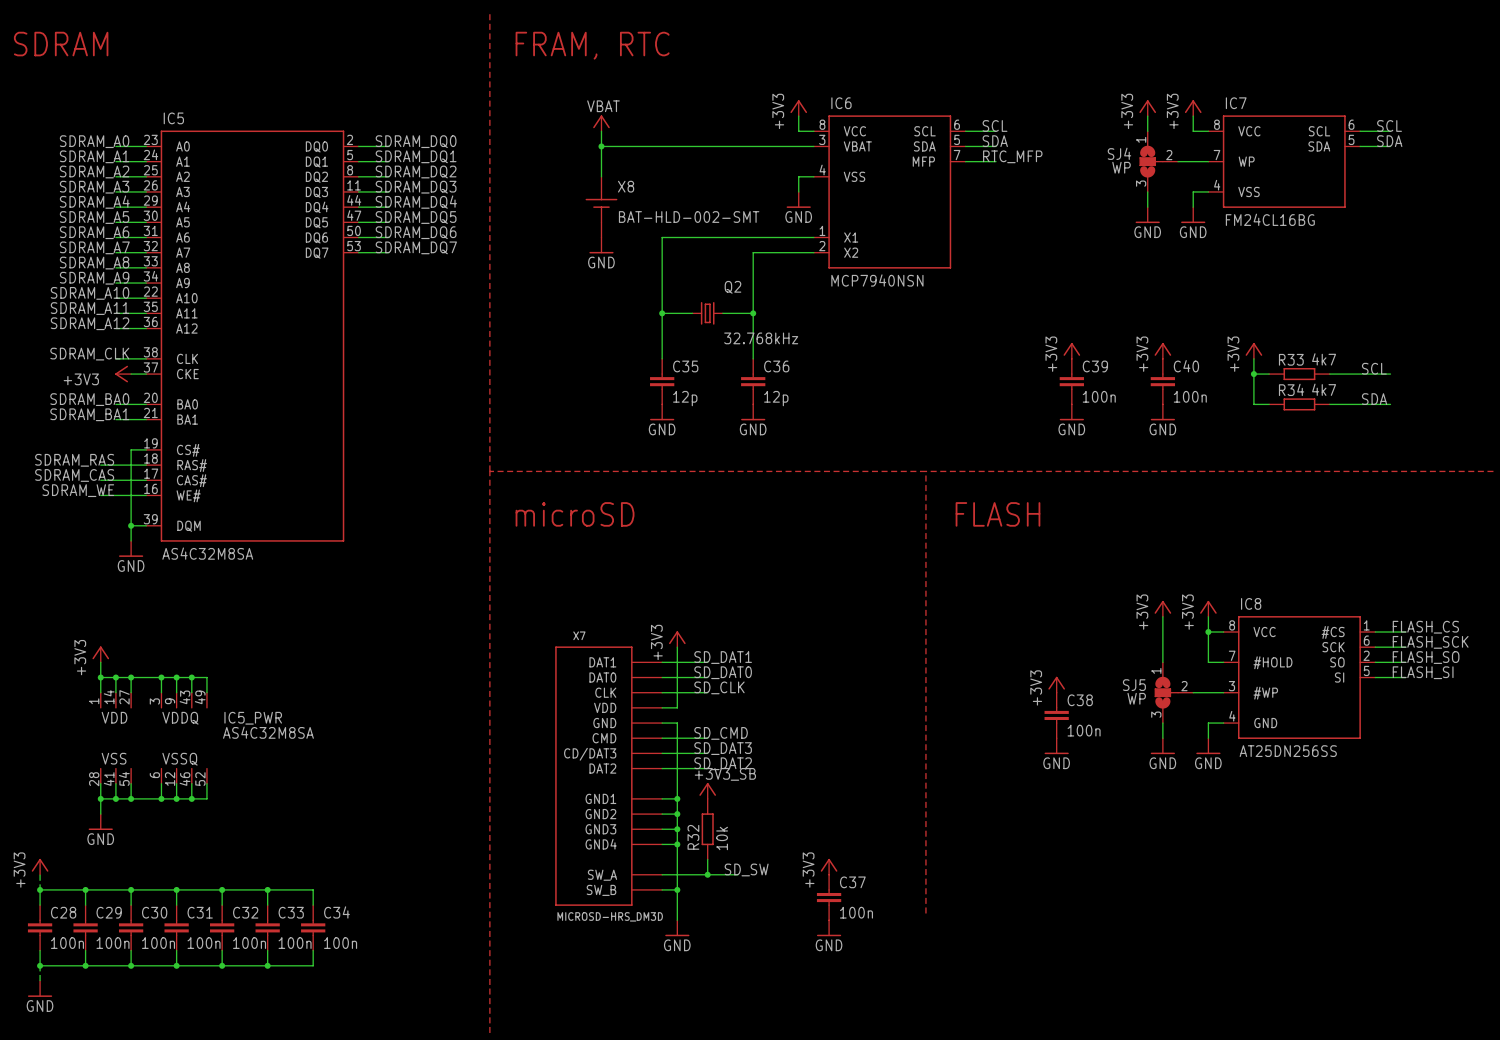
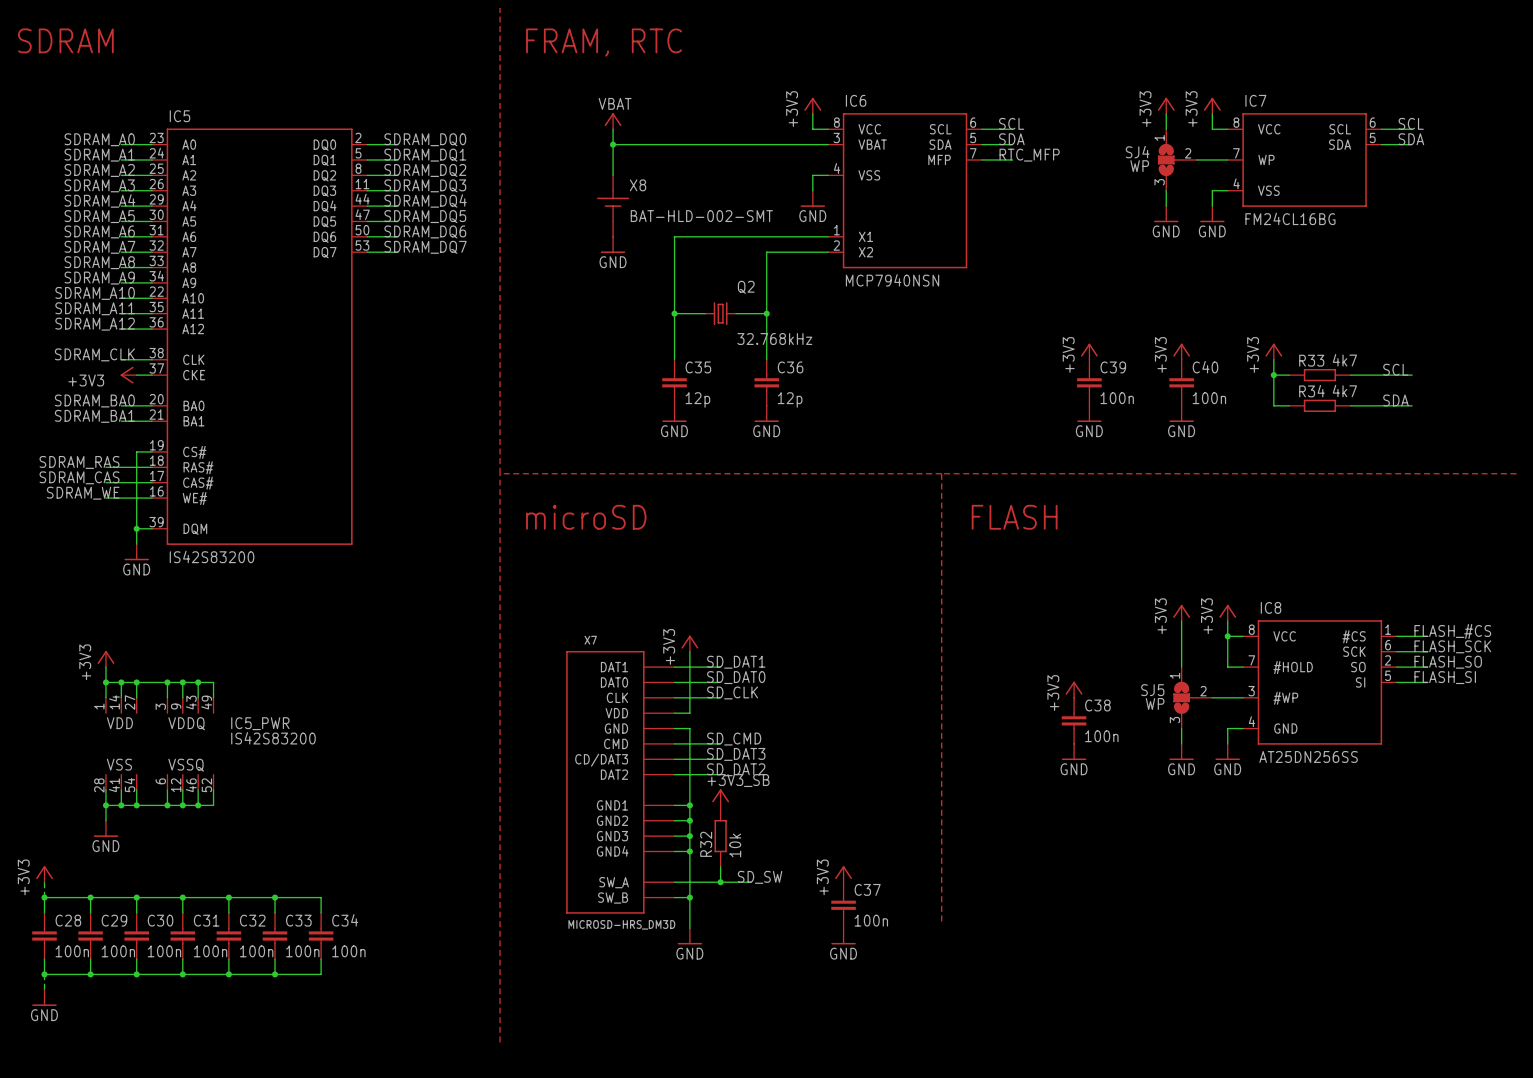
IC5 value: AS4C32M8SA (207, 553) -> IS42S83200 (212, 556)
label: FLASH_CS (1425, 627) -> FLASH_#CS (1452, 631)
IC5_PWR value: AS4C32M8SA (268, 732) -> IS42S83200 (273, 738)

